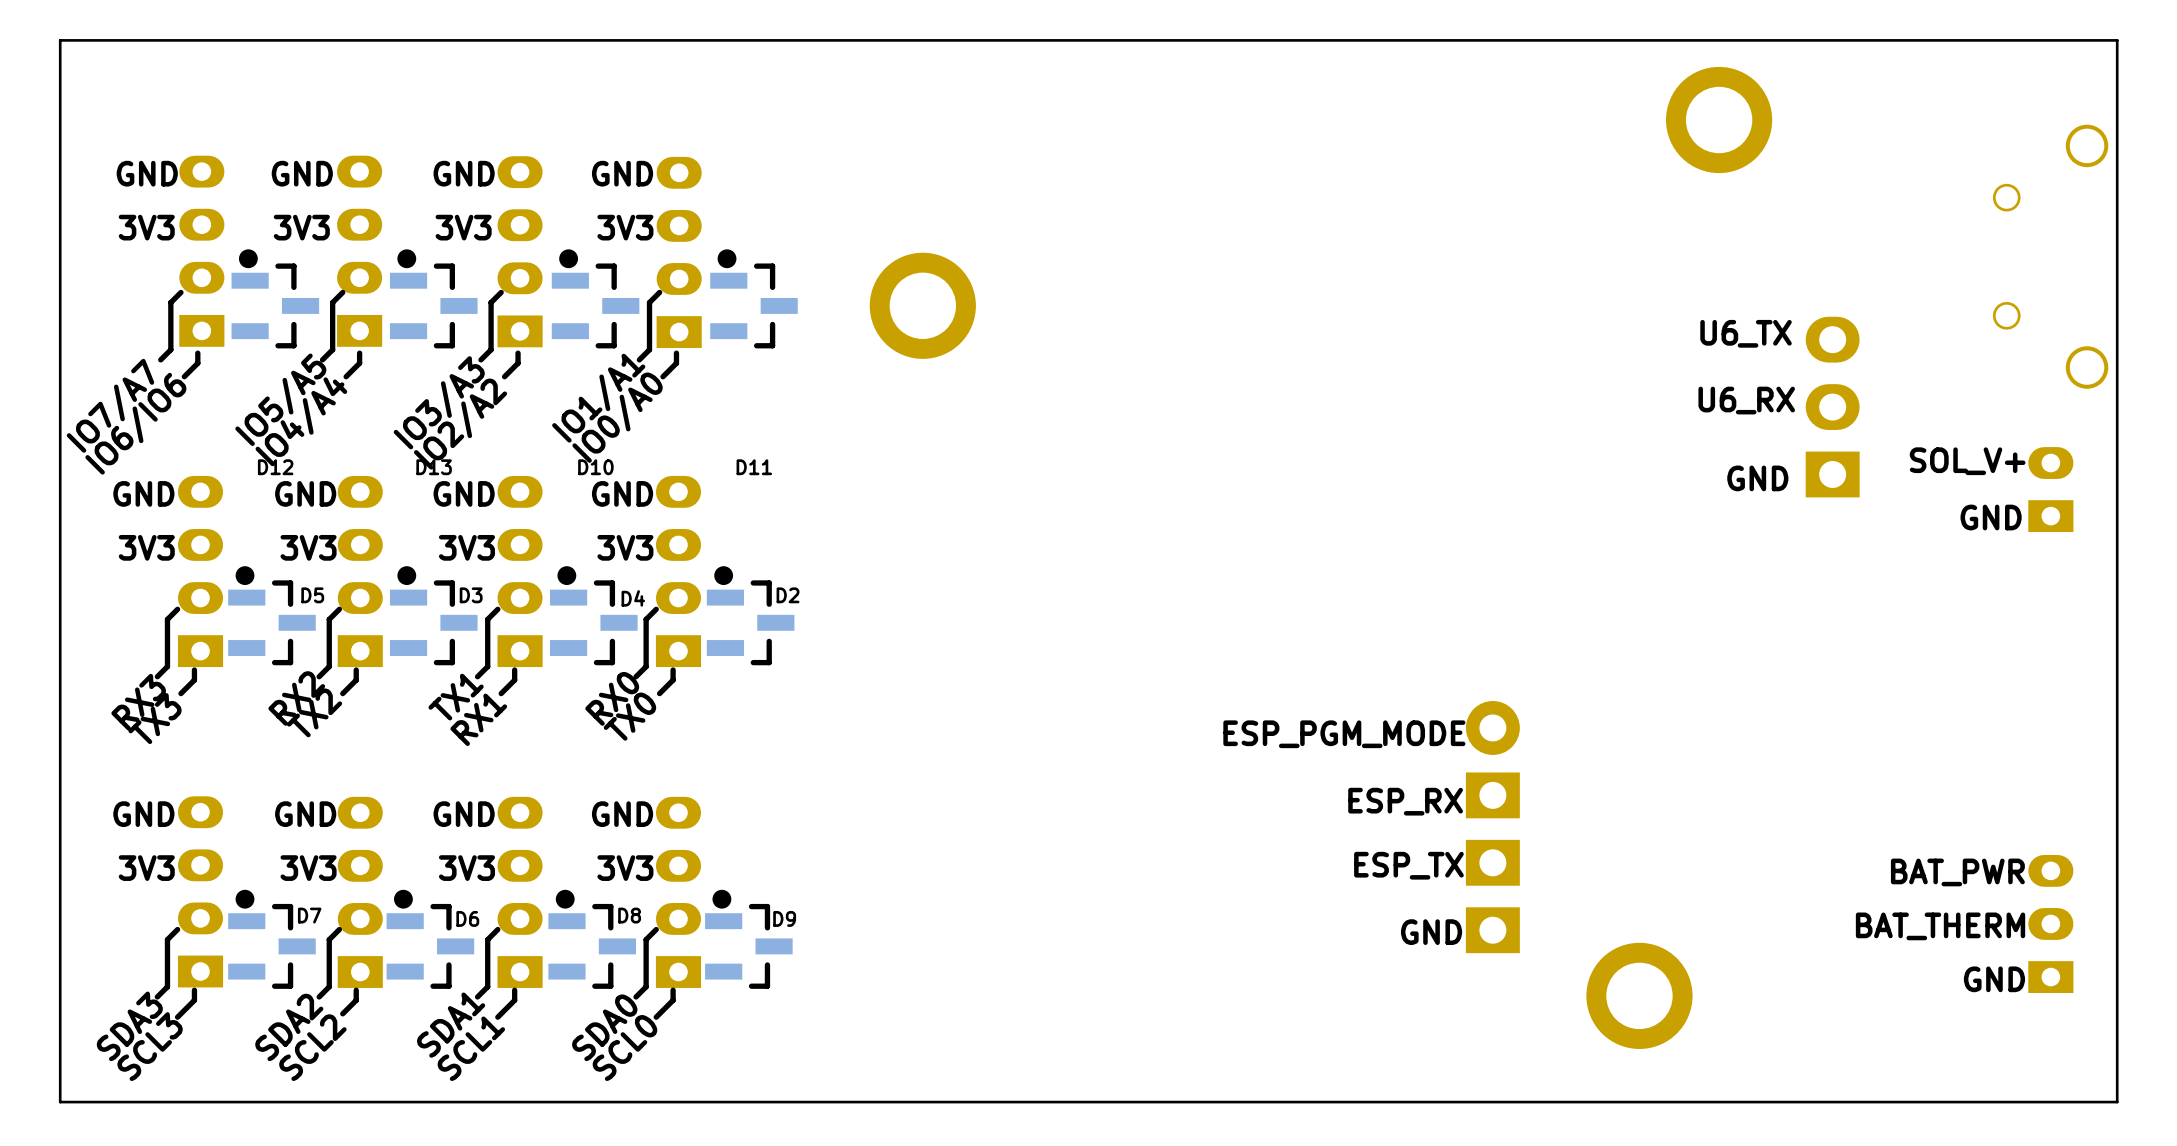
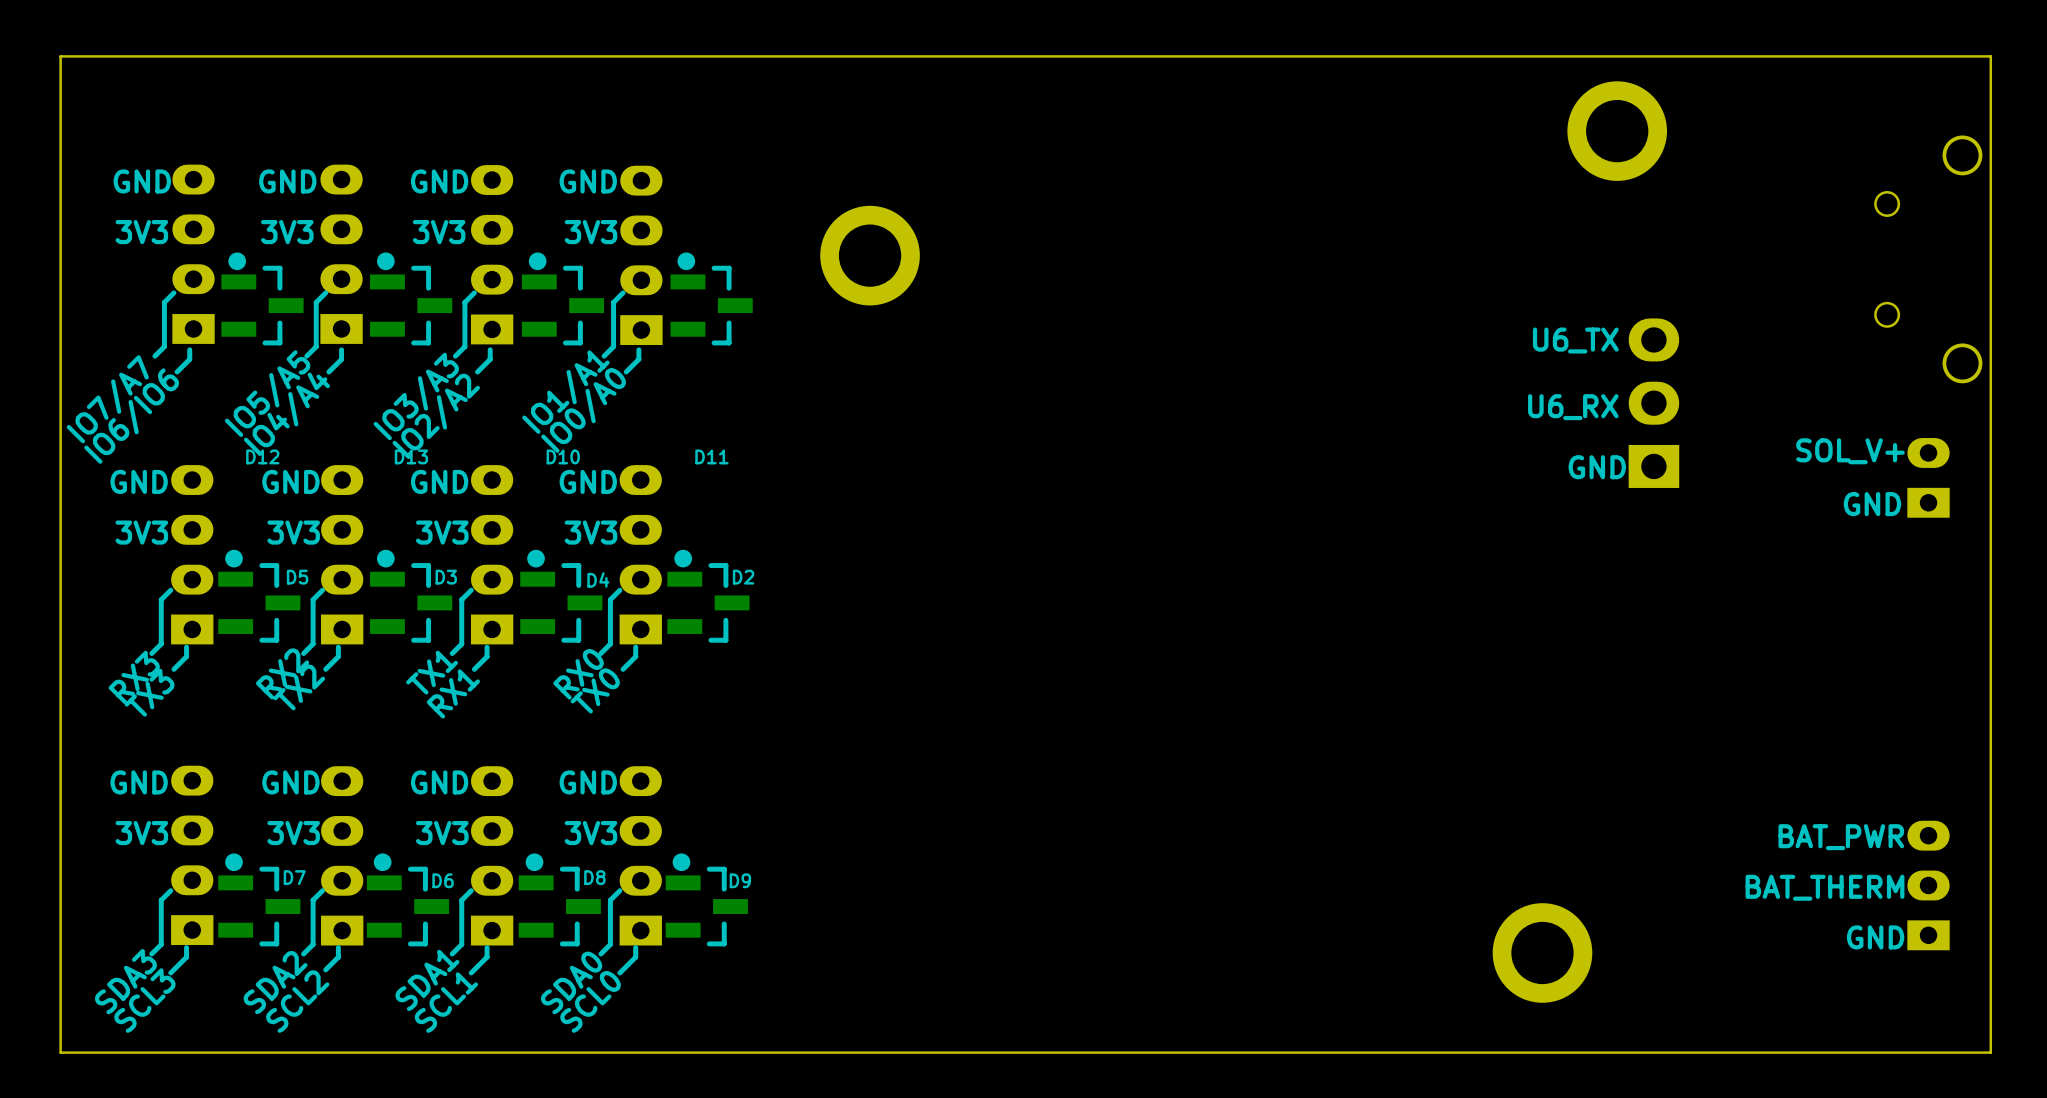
part position: (922, 305) -> (870, 255)
text position: U6_TX (1746, 333) -> U6_TX (1575, 340)
text position: U6_RX (1746, 400) -> U6_RX (1573, 407)
part position: (1832, 407) -> (1653, 403)
text position: GND (1757, 478) -> GND (1597, 467)
text: ESP_PGM_MODE (1344, 734) -> none
text: ESP_RX (1405, 801) -> none
part: (1492, 827) -> none
text: ESP_TX (1408, 865) -> none
text: GND (1431, 932) -> none

